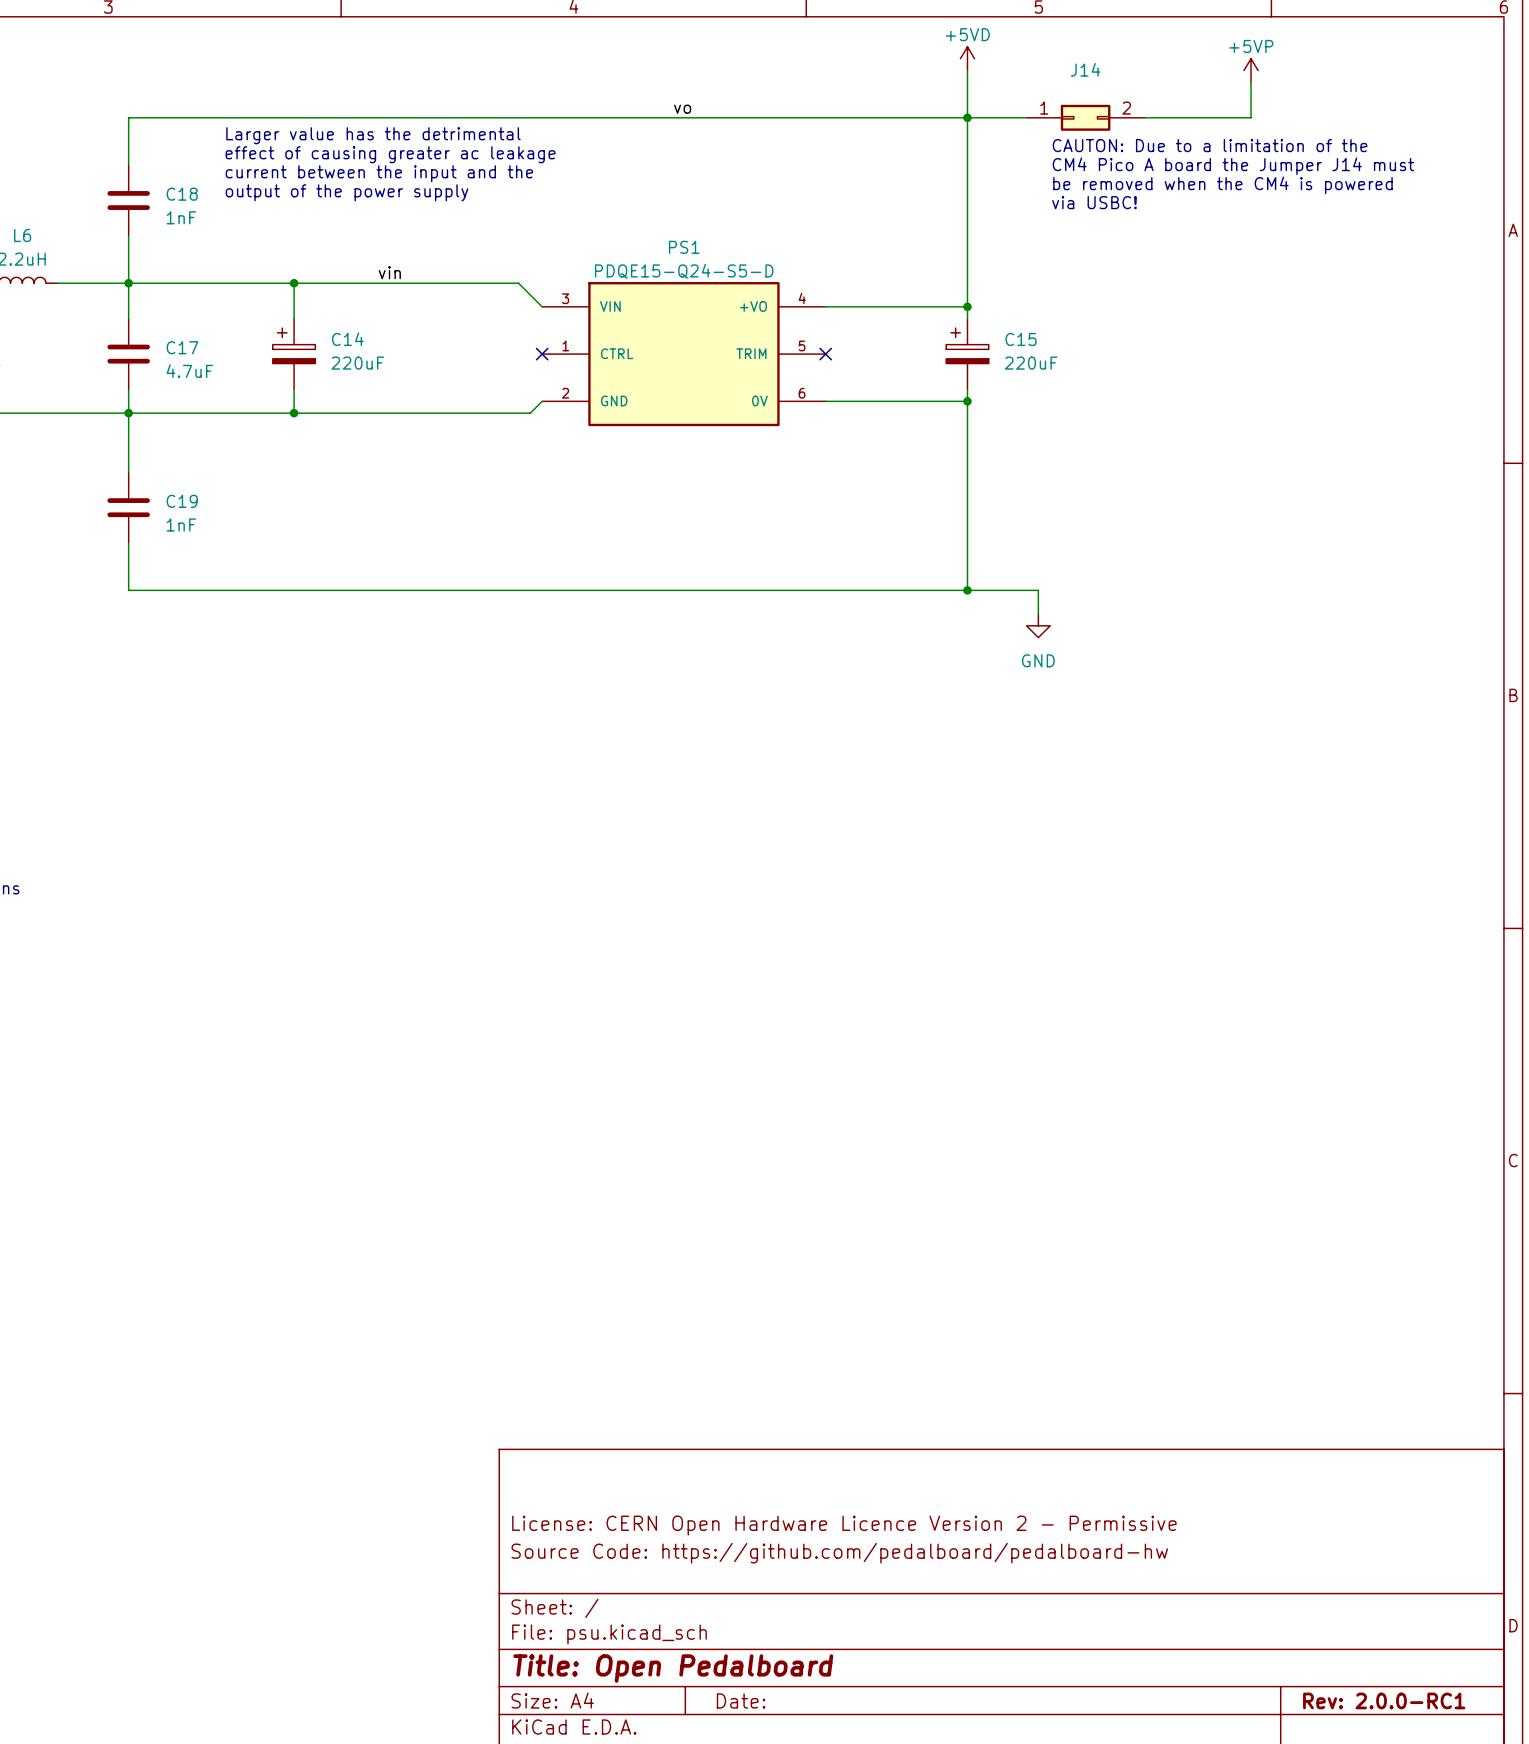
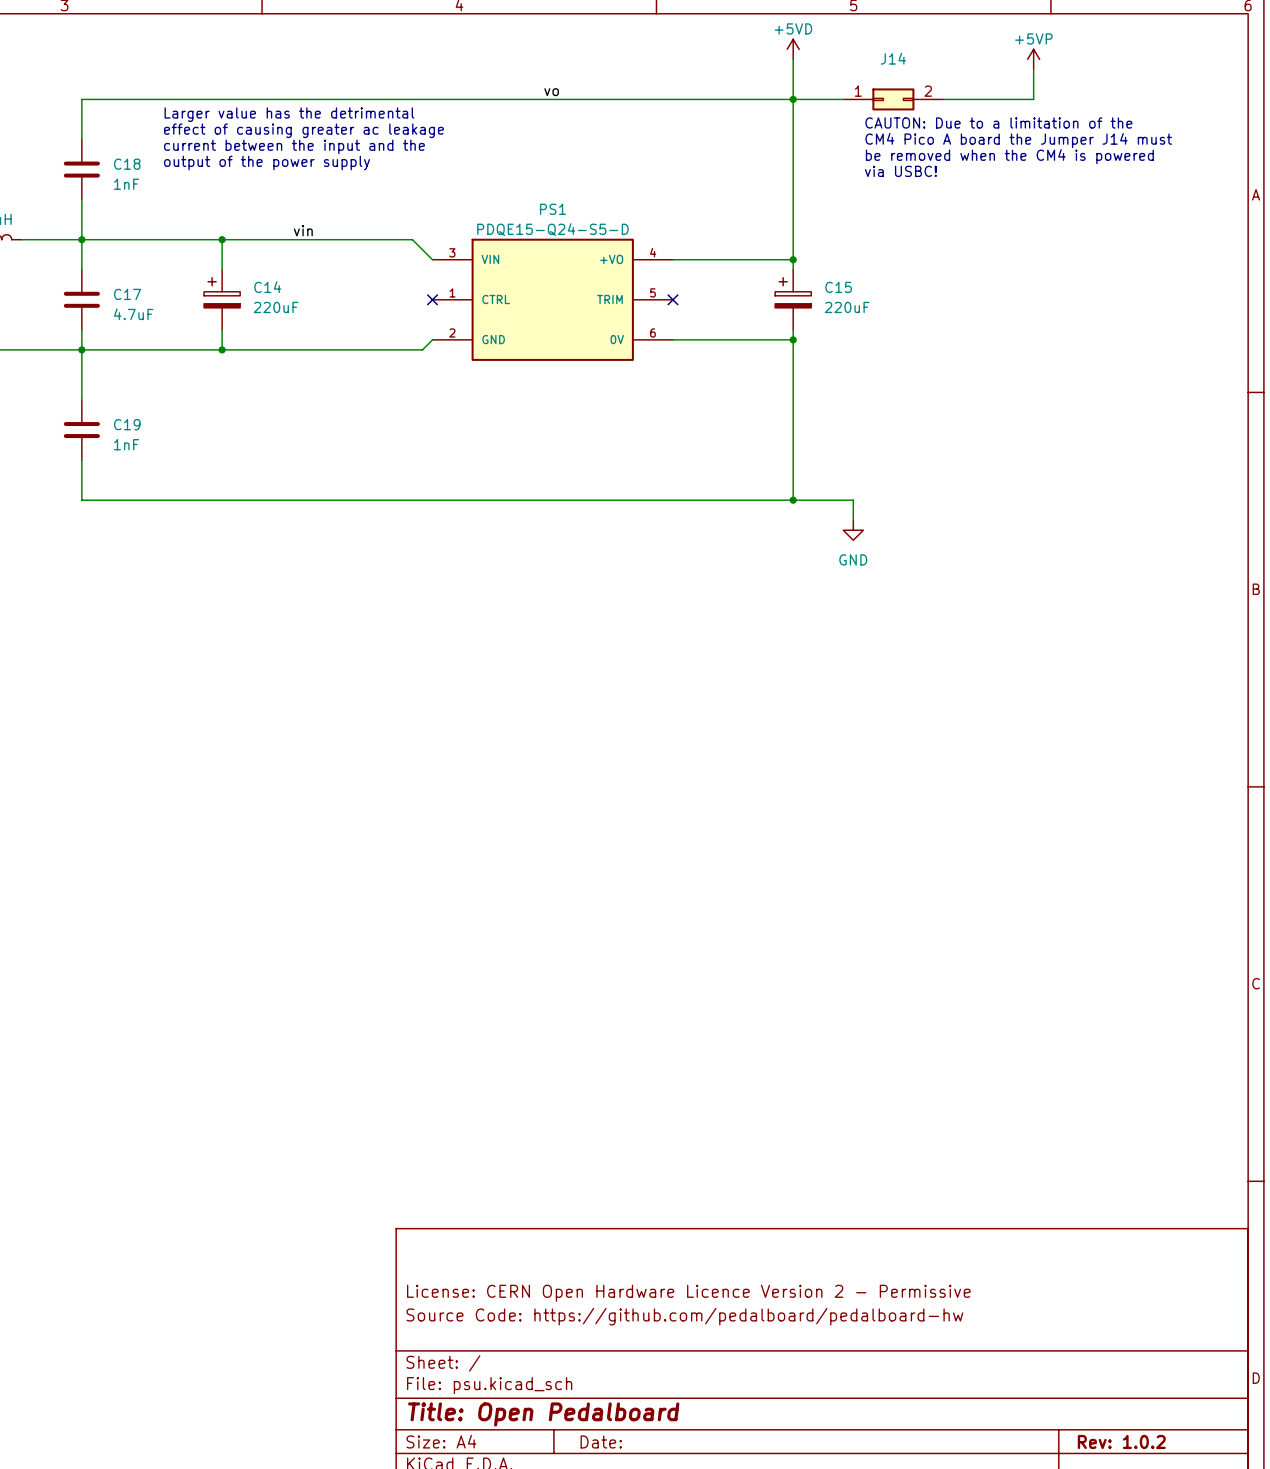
title block: Rev: 2.0.0-RC1 (1384, 1700) -> Rev: 1.0.2 (1121, 1441)

